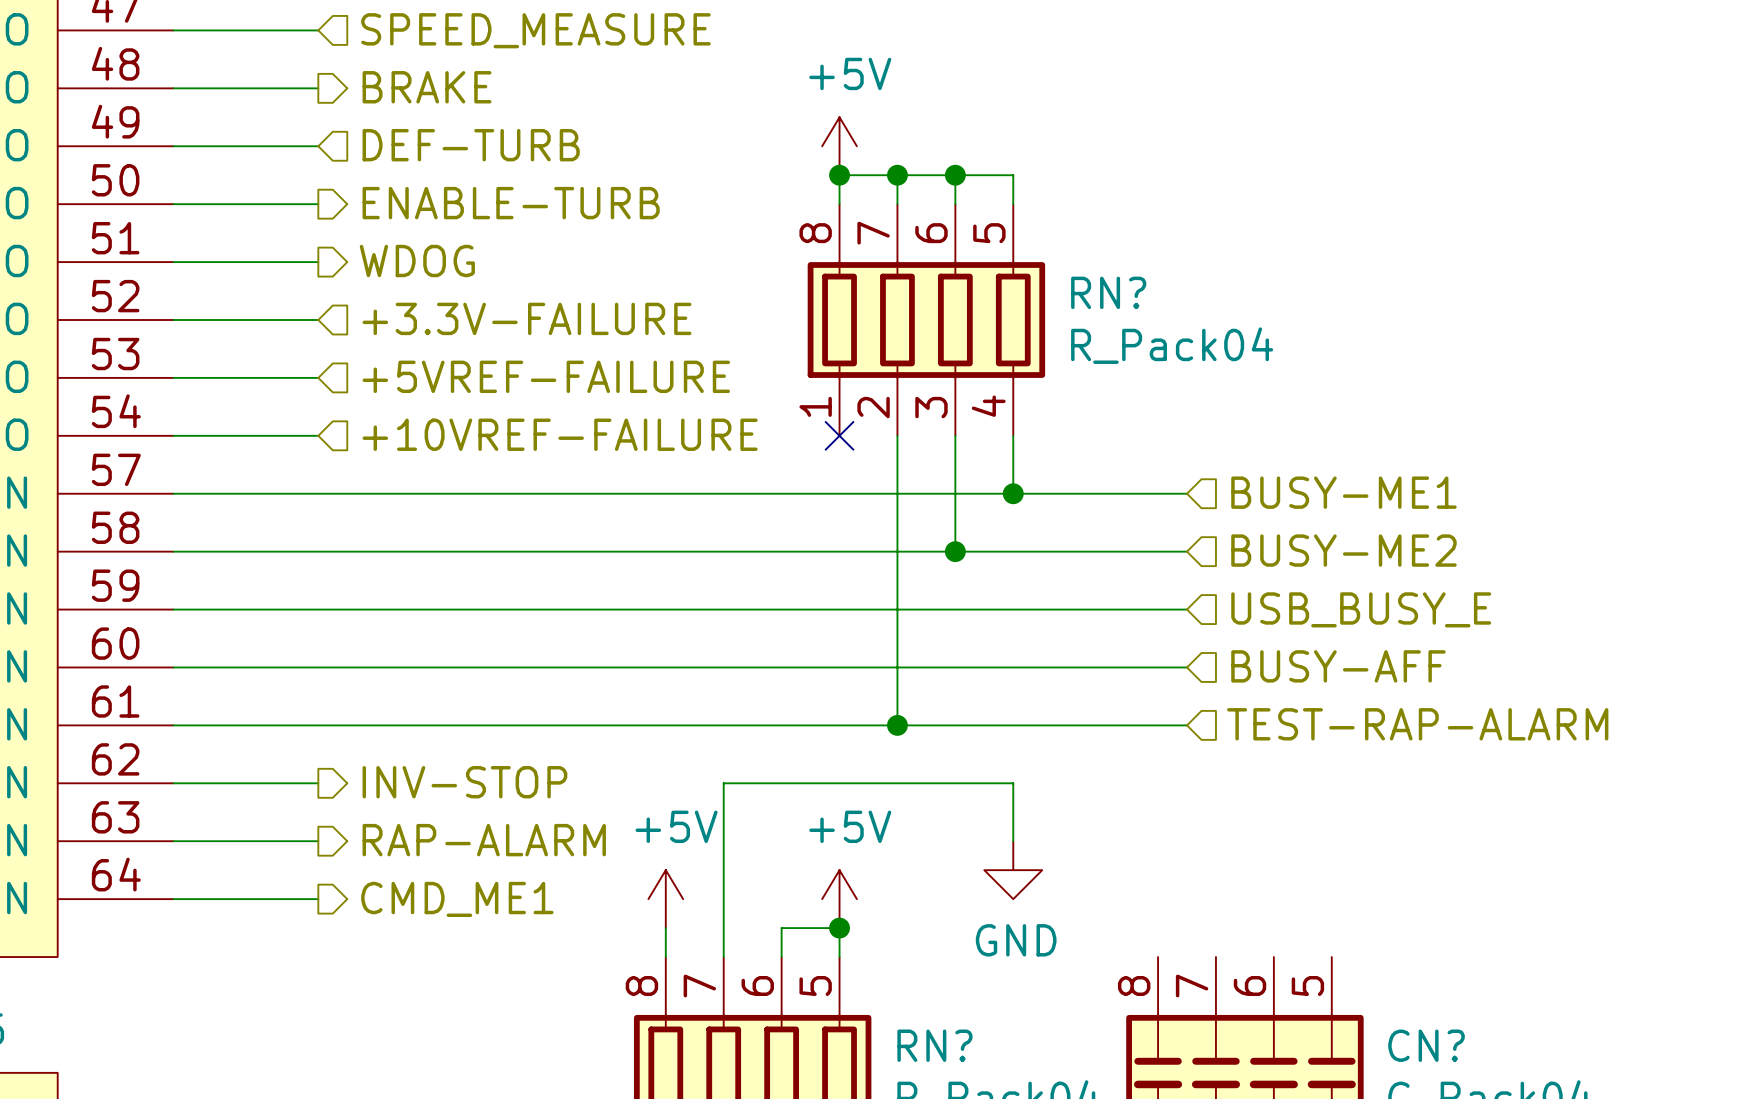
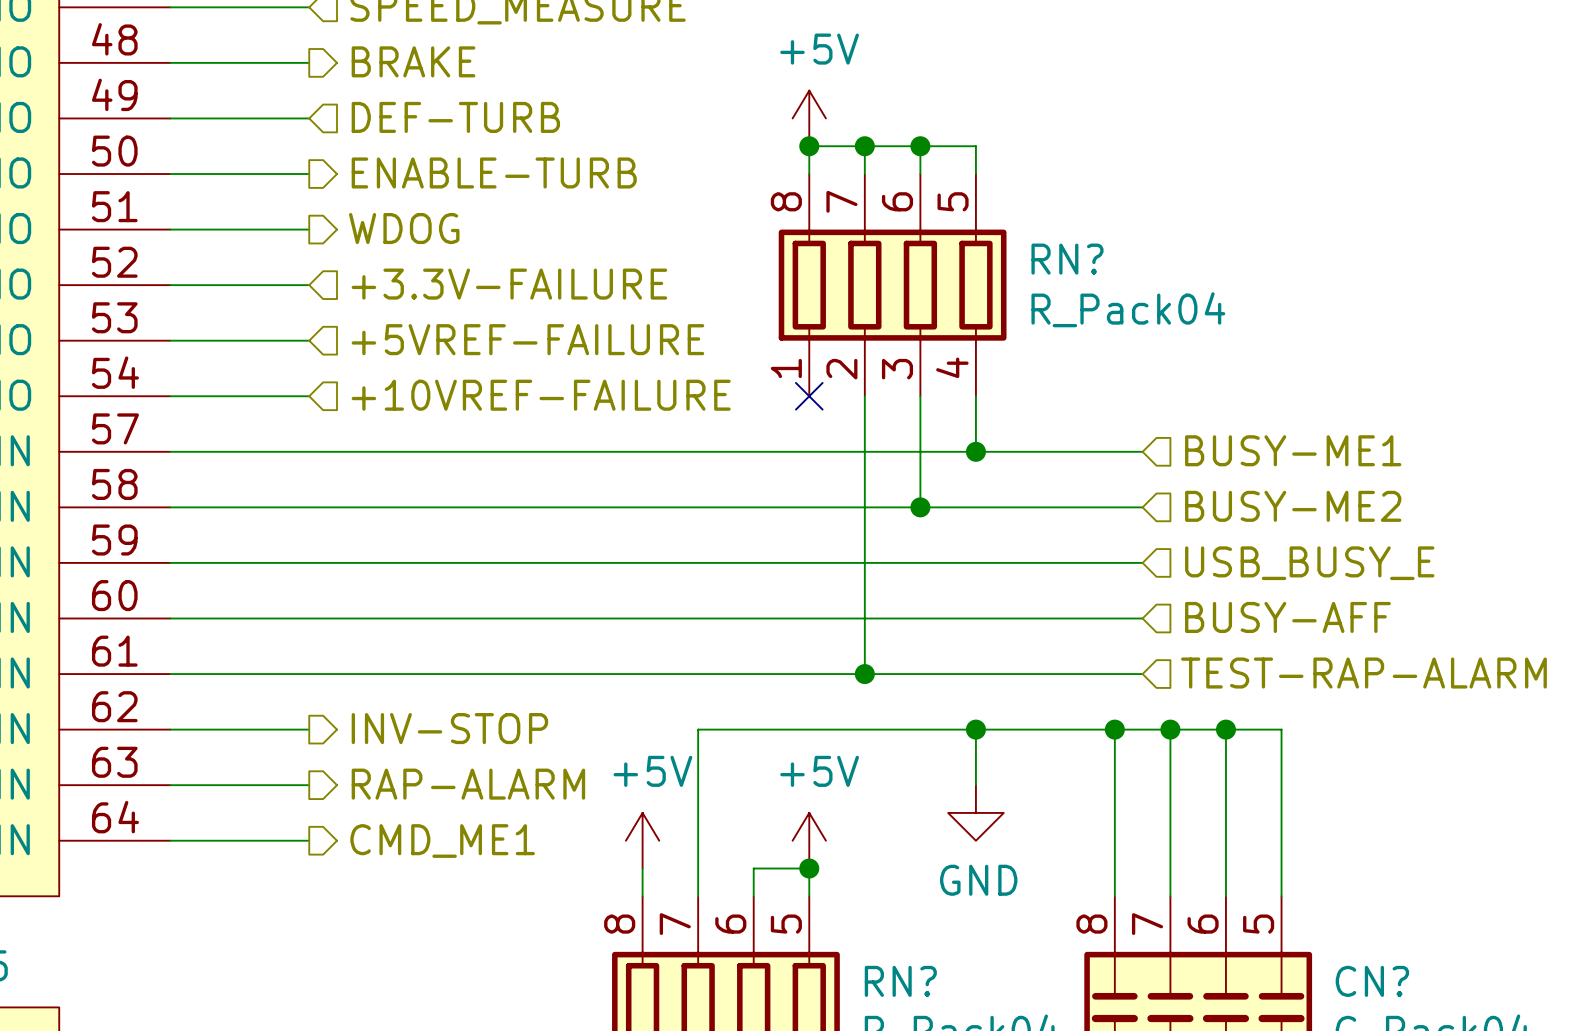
wire: none -> (975, 729) (1281, 729) (1281, 896)
junction: none -> (975, 729)
wire: none -> (1114, 729) (1114, 896)
junction: none -> (1114, 729)
wire: none -> (1170, 729) (1170, 896)
junction: none -> (1170, 729)
wire: none -> (1225, 729) (1225, 896)
junction: none -> (1225, 729)

